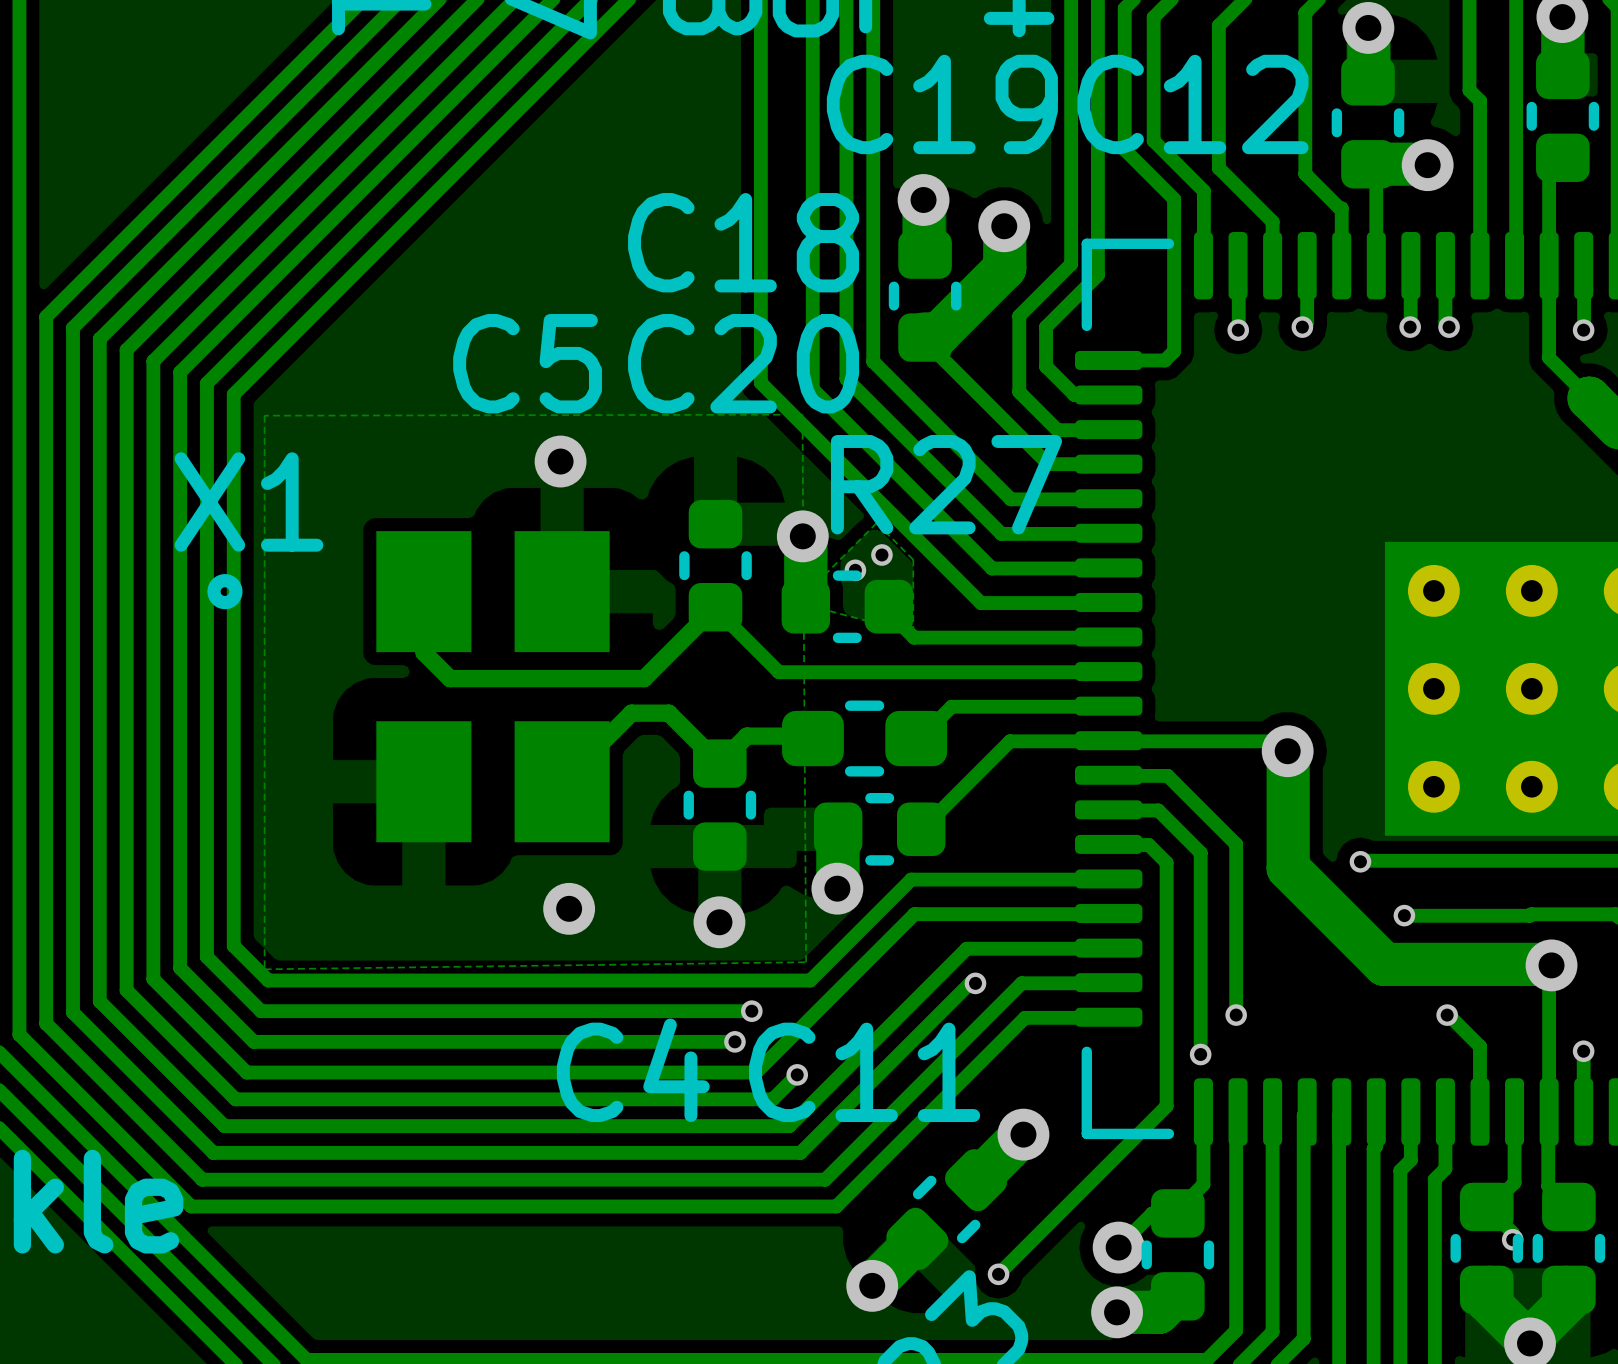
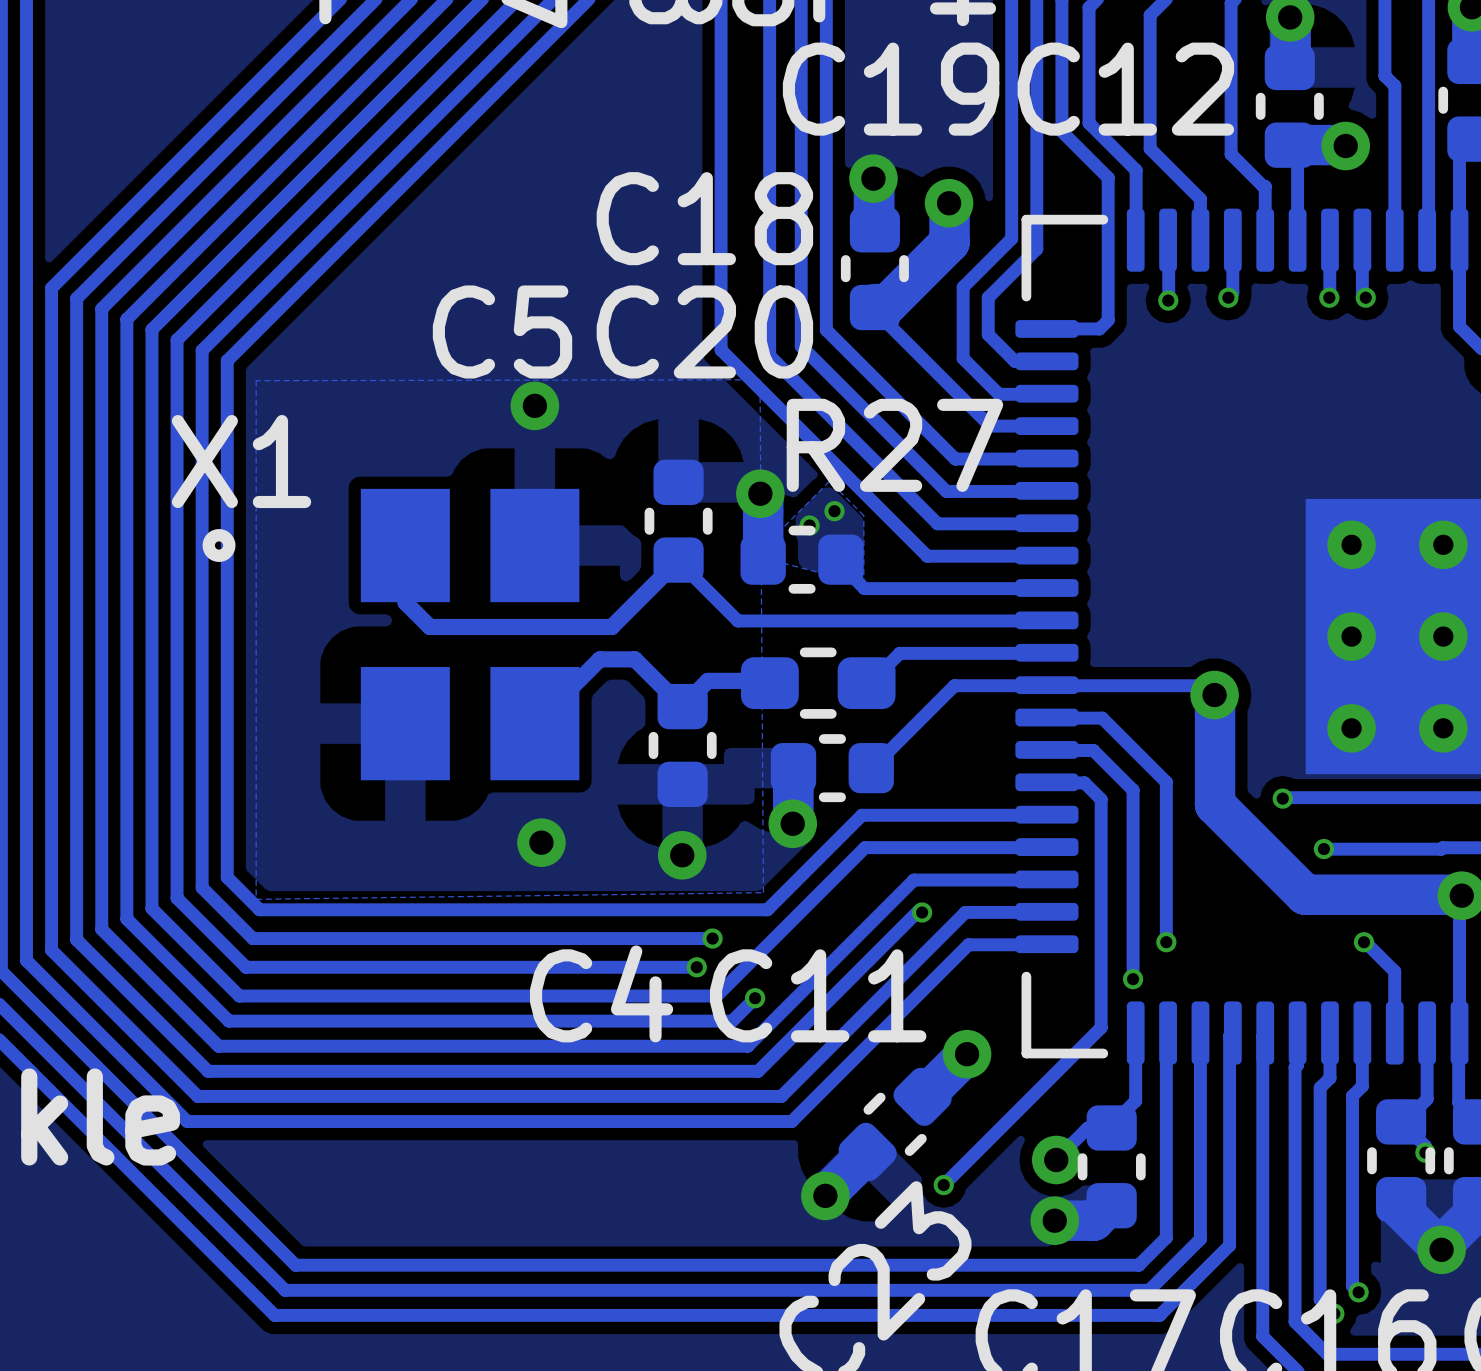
via position: (560, 461) -> (534, 405)

